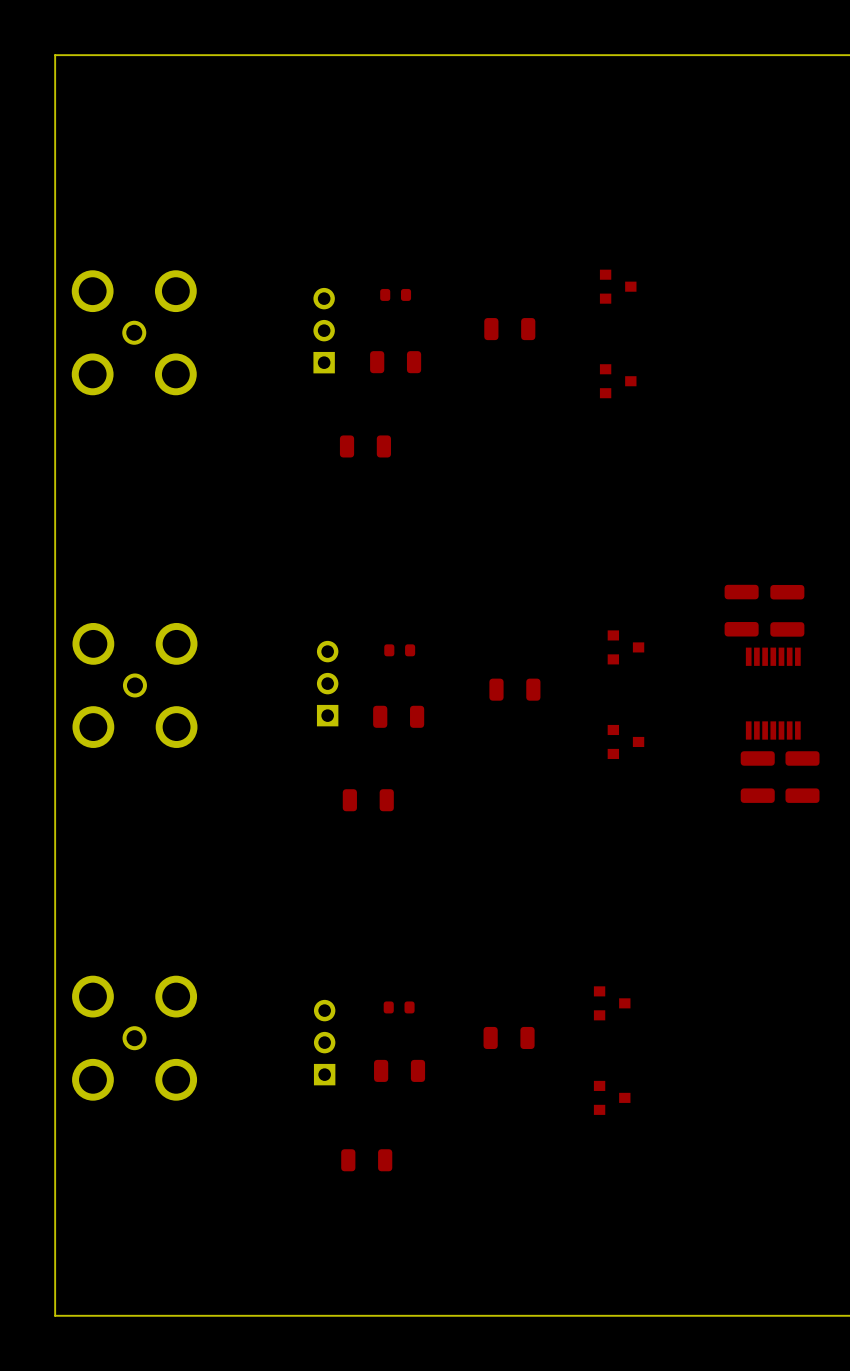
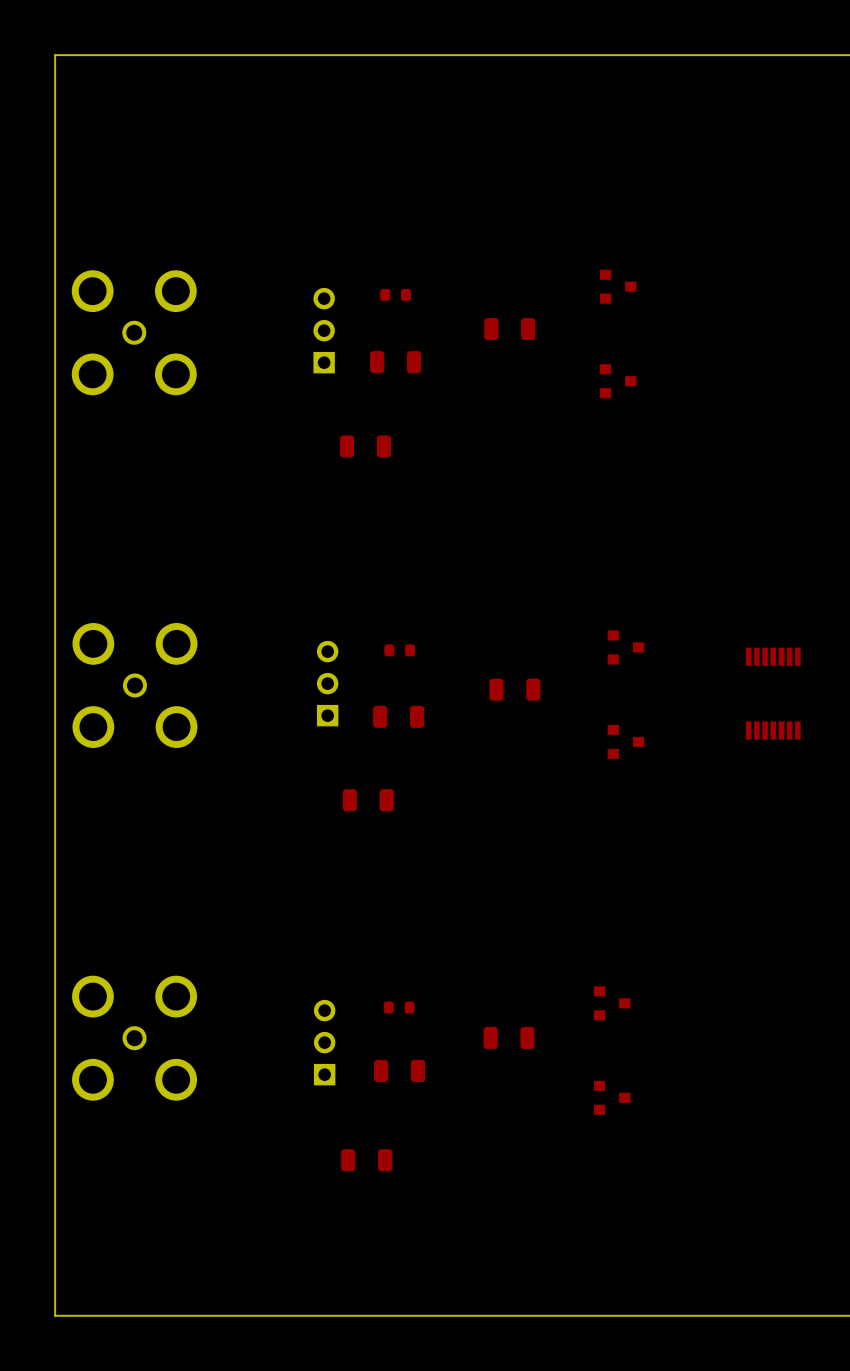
part: (741, 610) -> none
part: (787, 610) -> none
part: (757, 777) -> none
part: (802, 777) -> none

